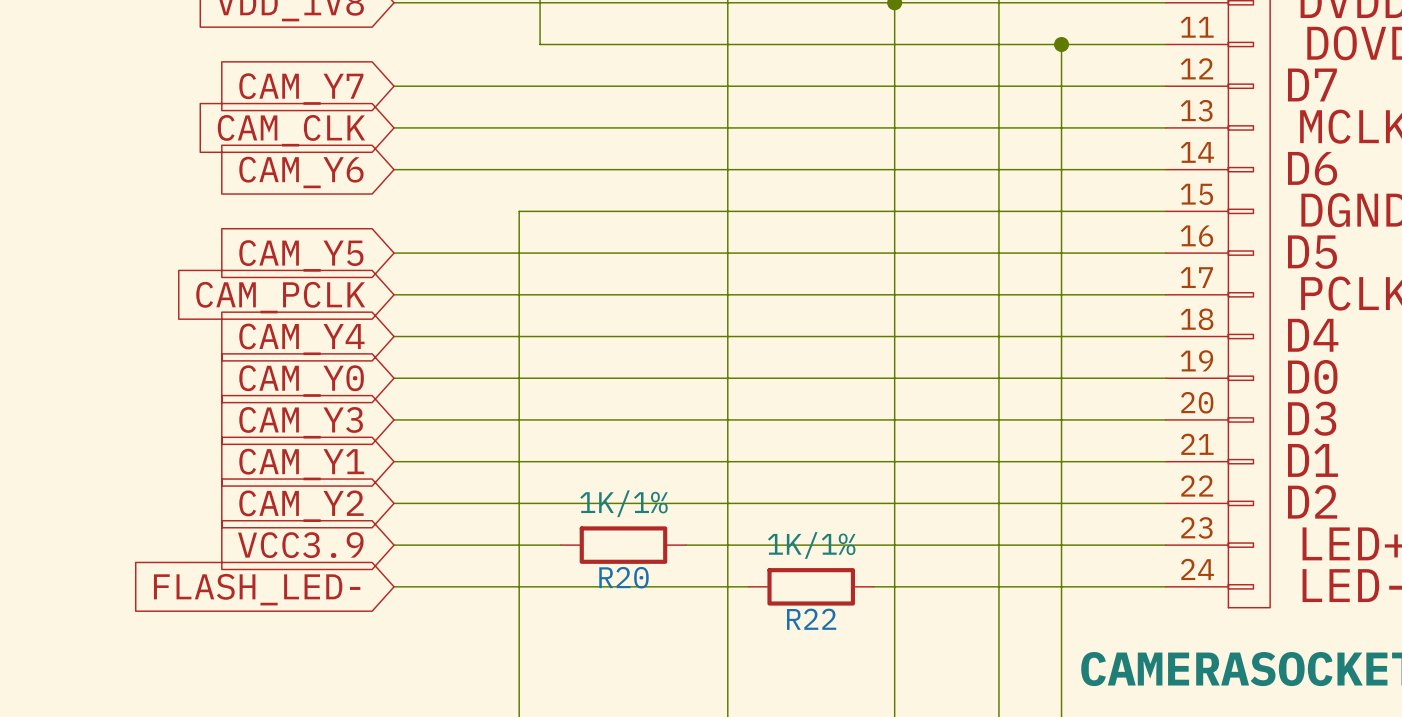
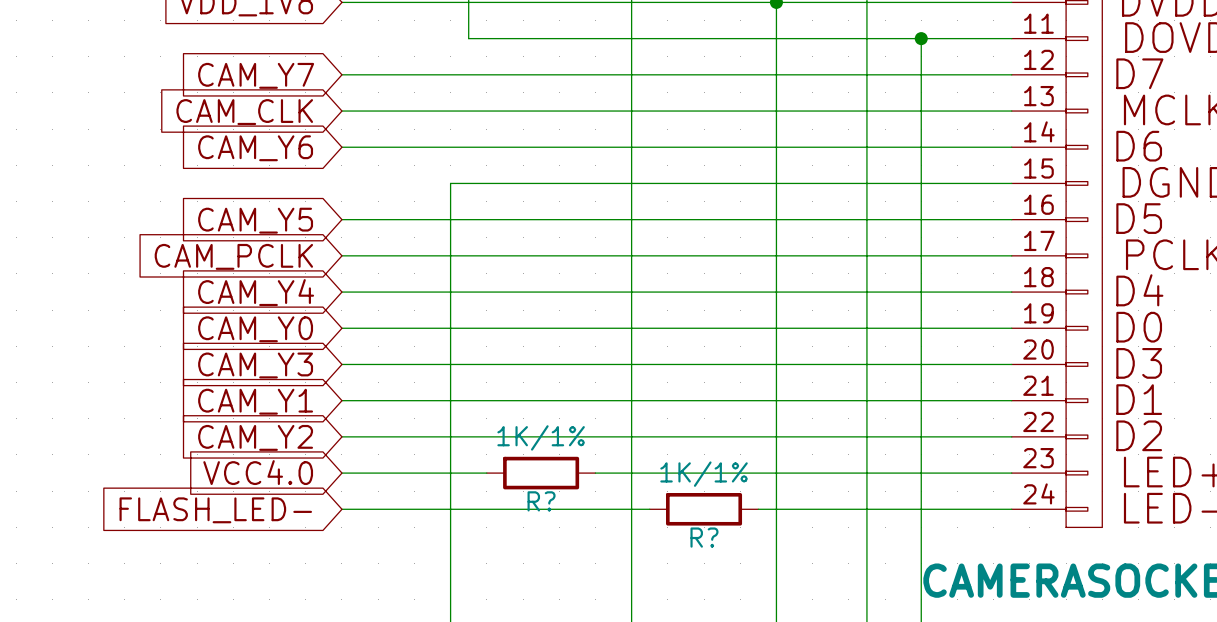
global label: VCC3.9 (300, 545) -> VCC4.0 (258, 472)
R20 name: R20 (624, 577) -> R? (541, 501)
R22 name: R22 (811, 619) -> R? (704, 537)

